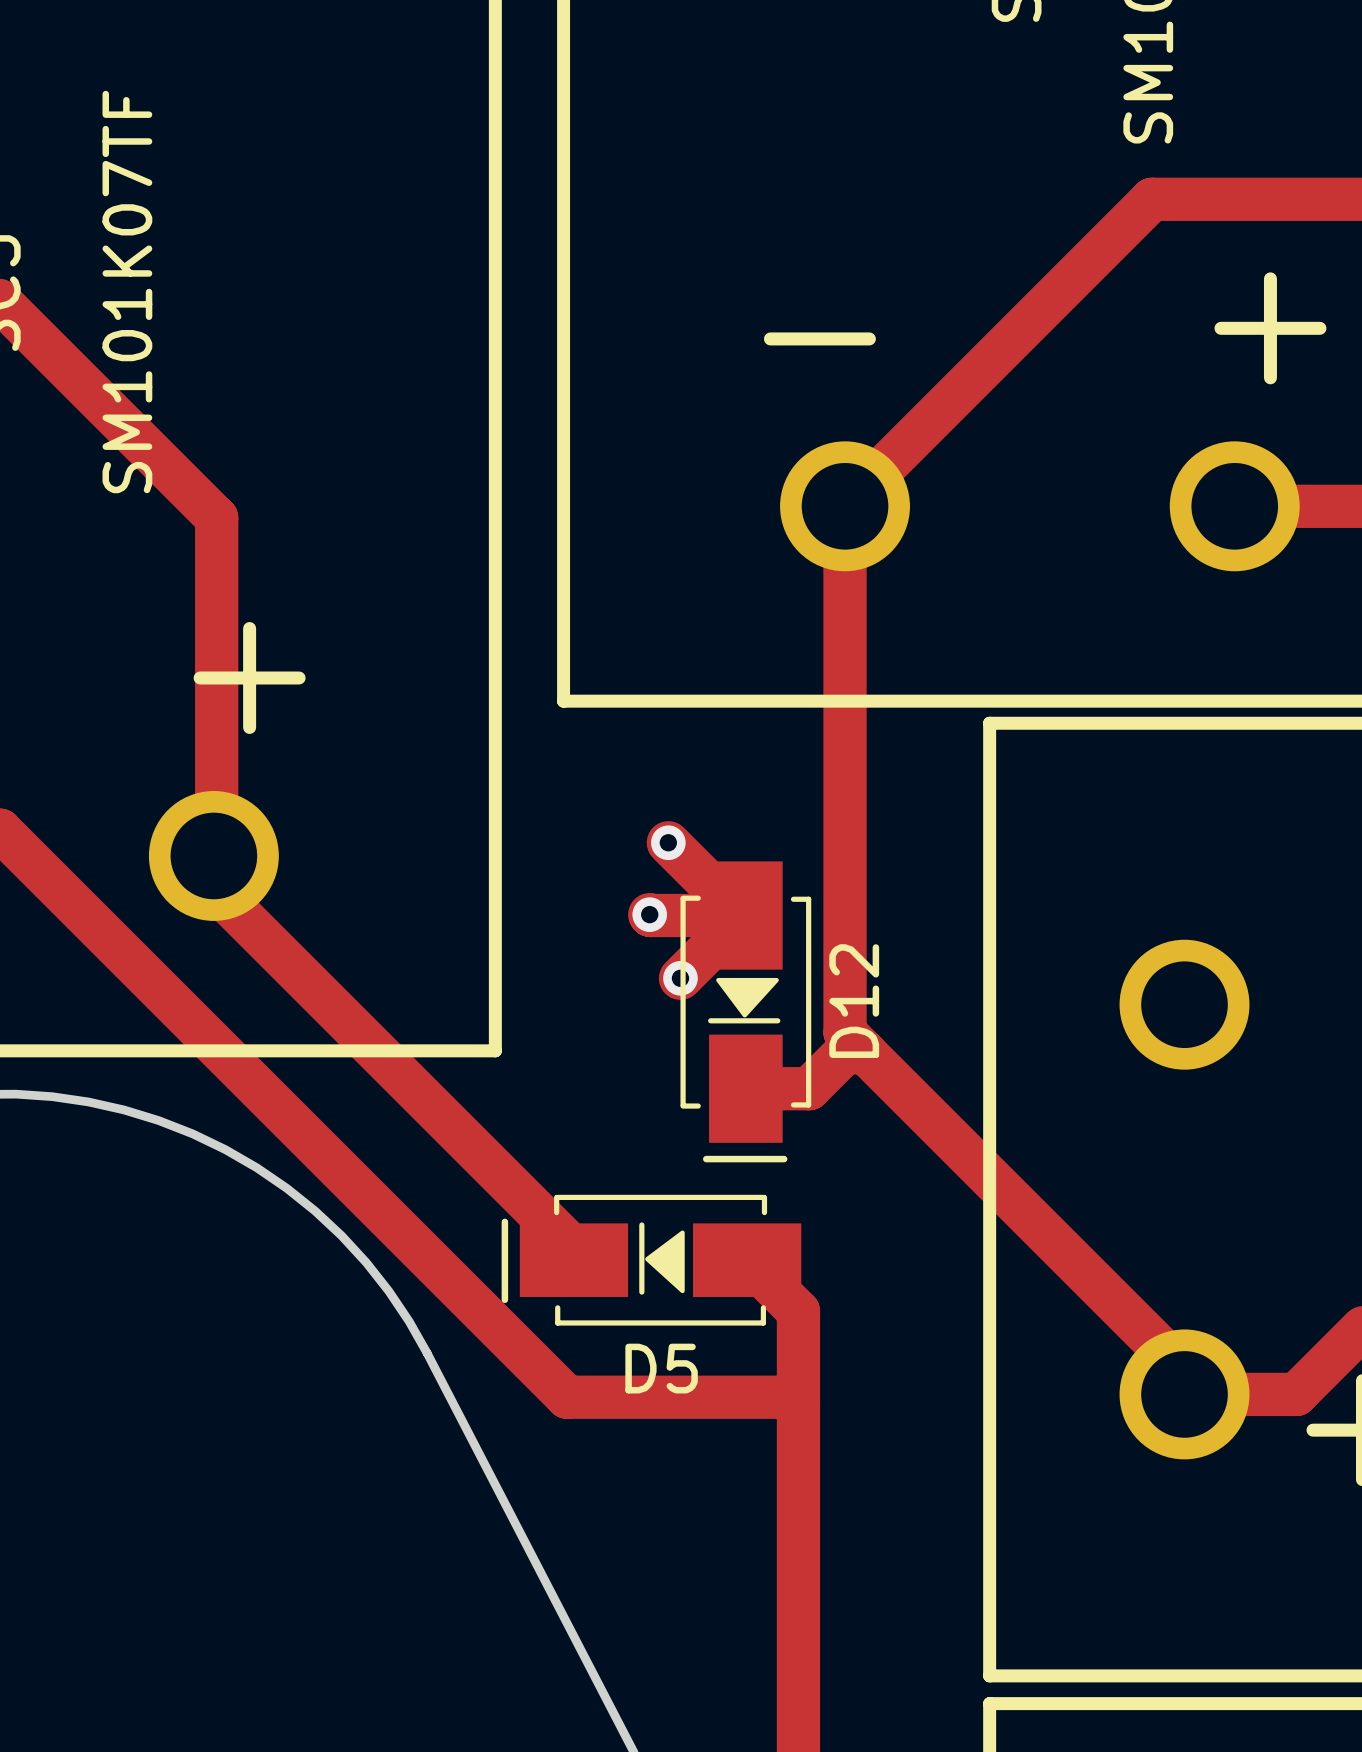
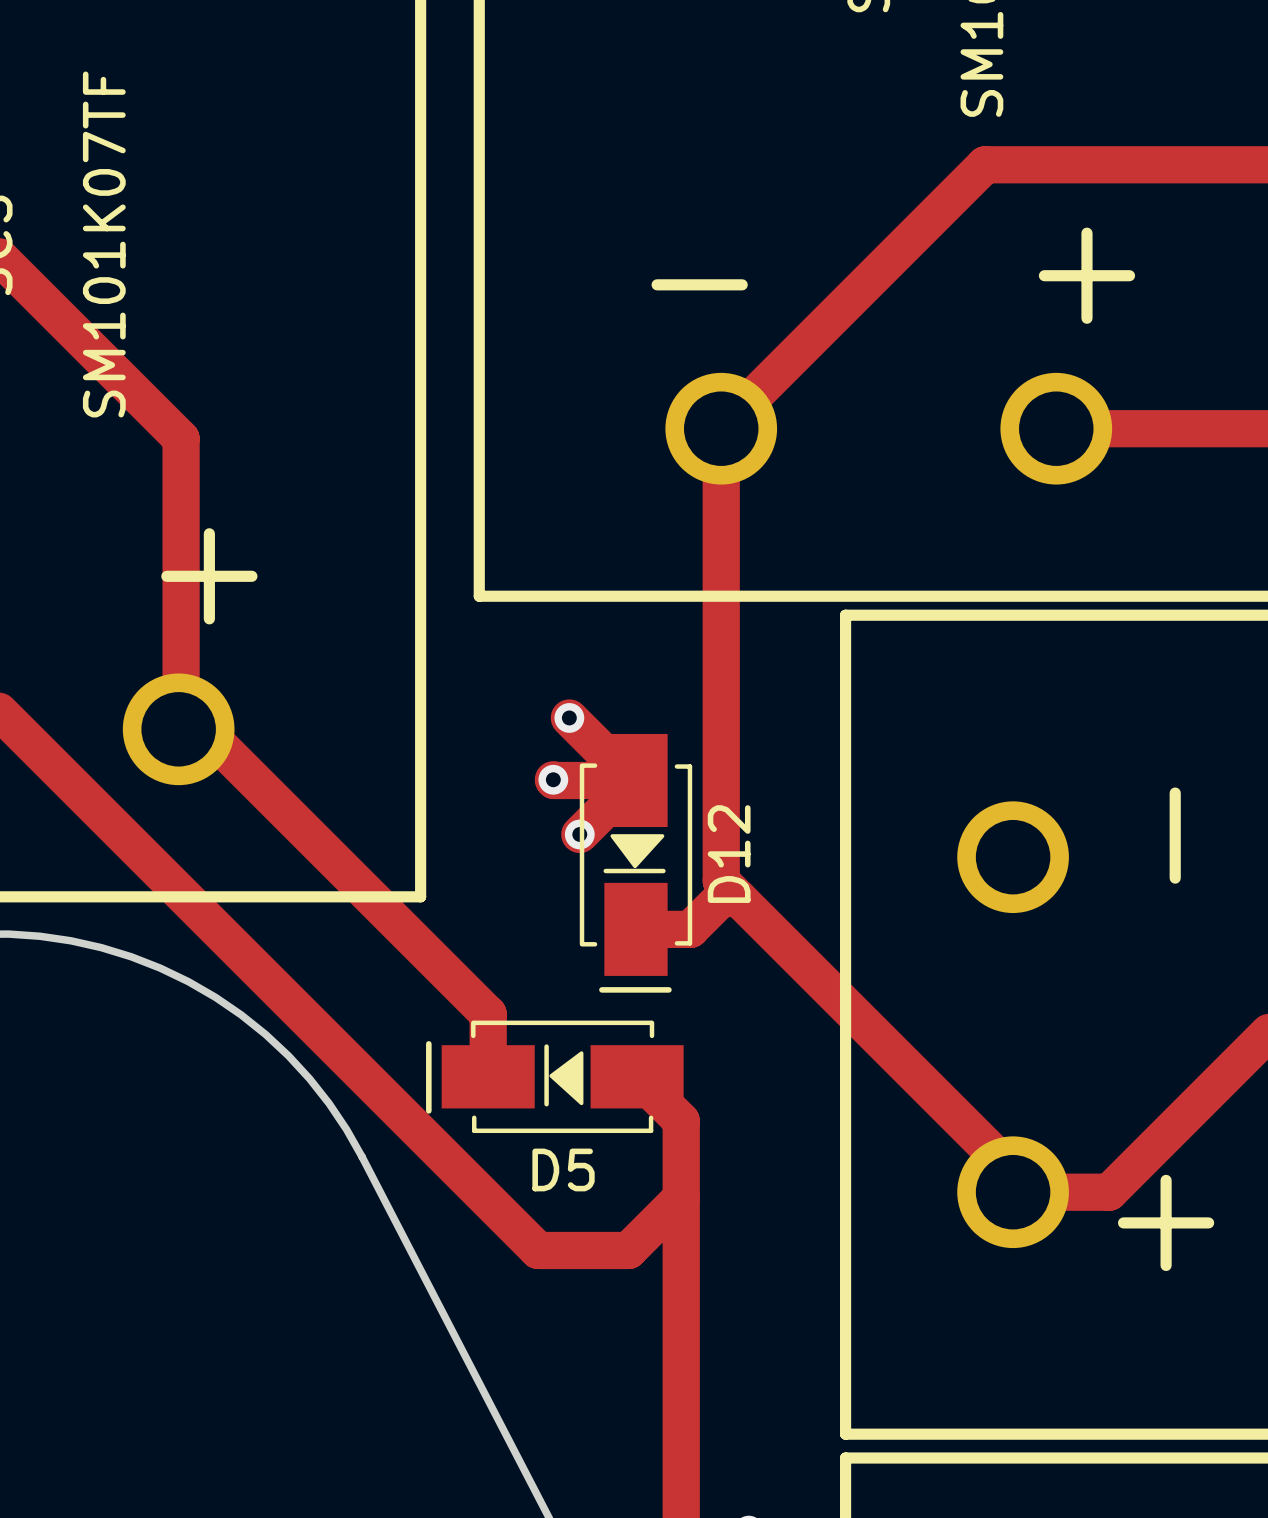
track: (216, 830) (216, 891) (573, 1248) -> (181, 707) (488, 1014) (488, 1066)
track: (567, 1397) (794, 1397) (798, 1400) -> (482, 1194) (538, 1250) (628, 1250) (681, 1197)

